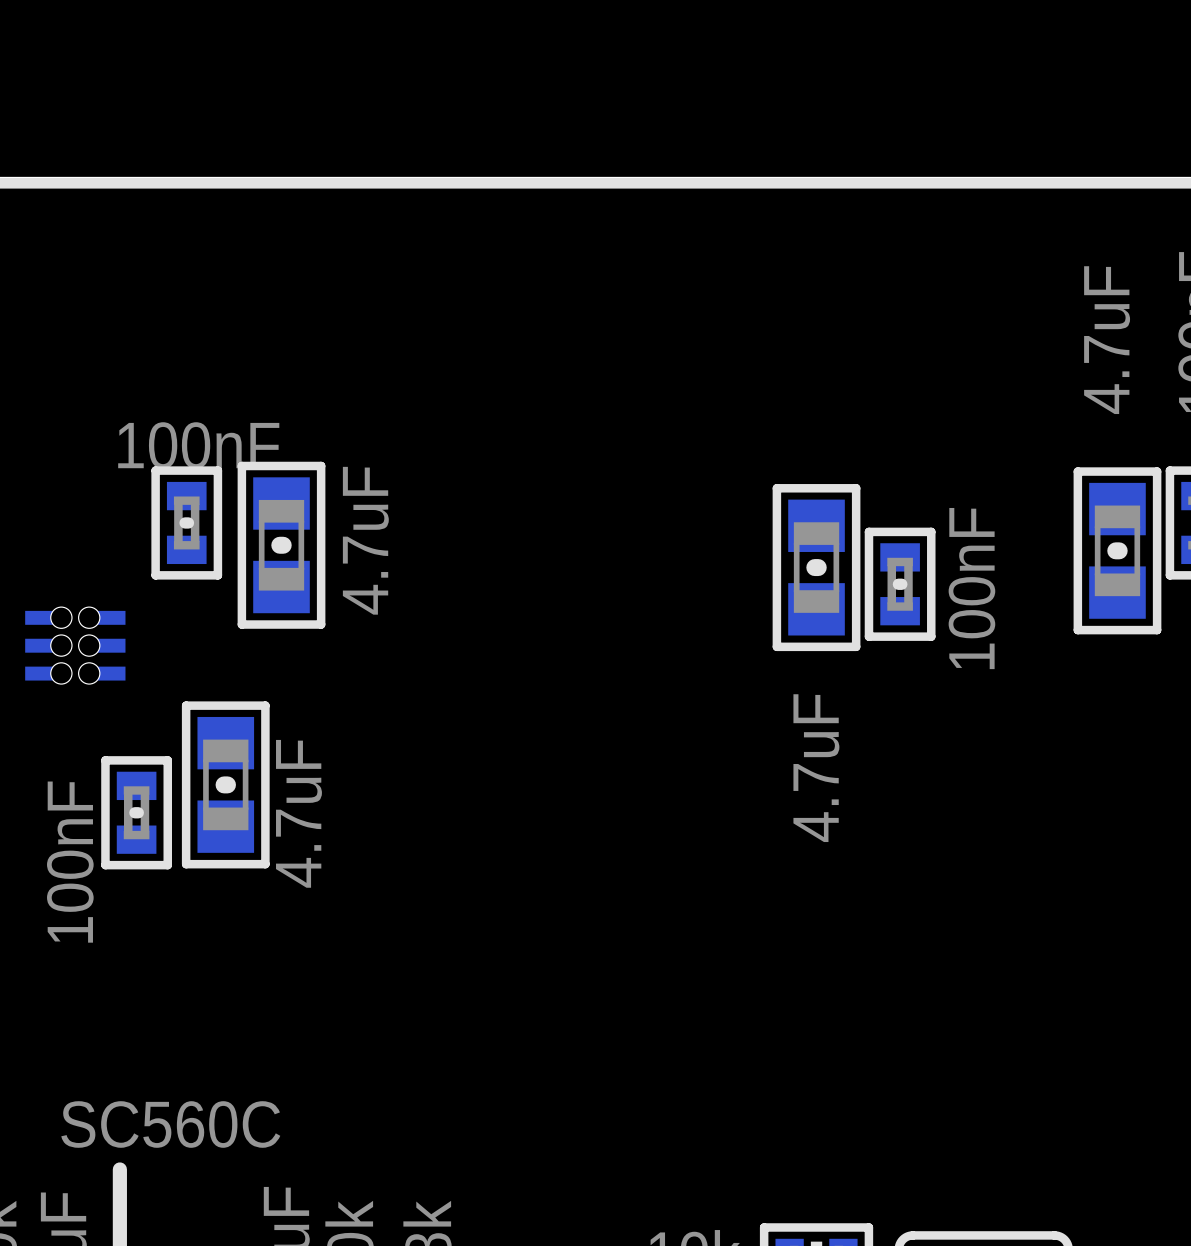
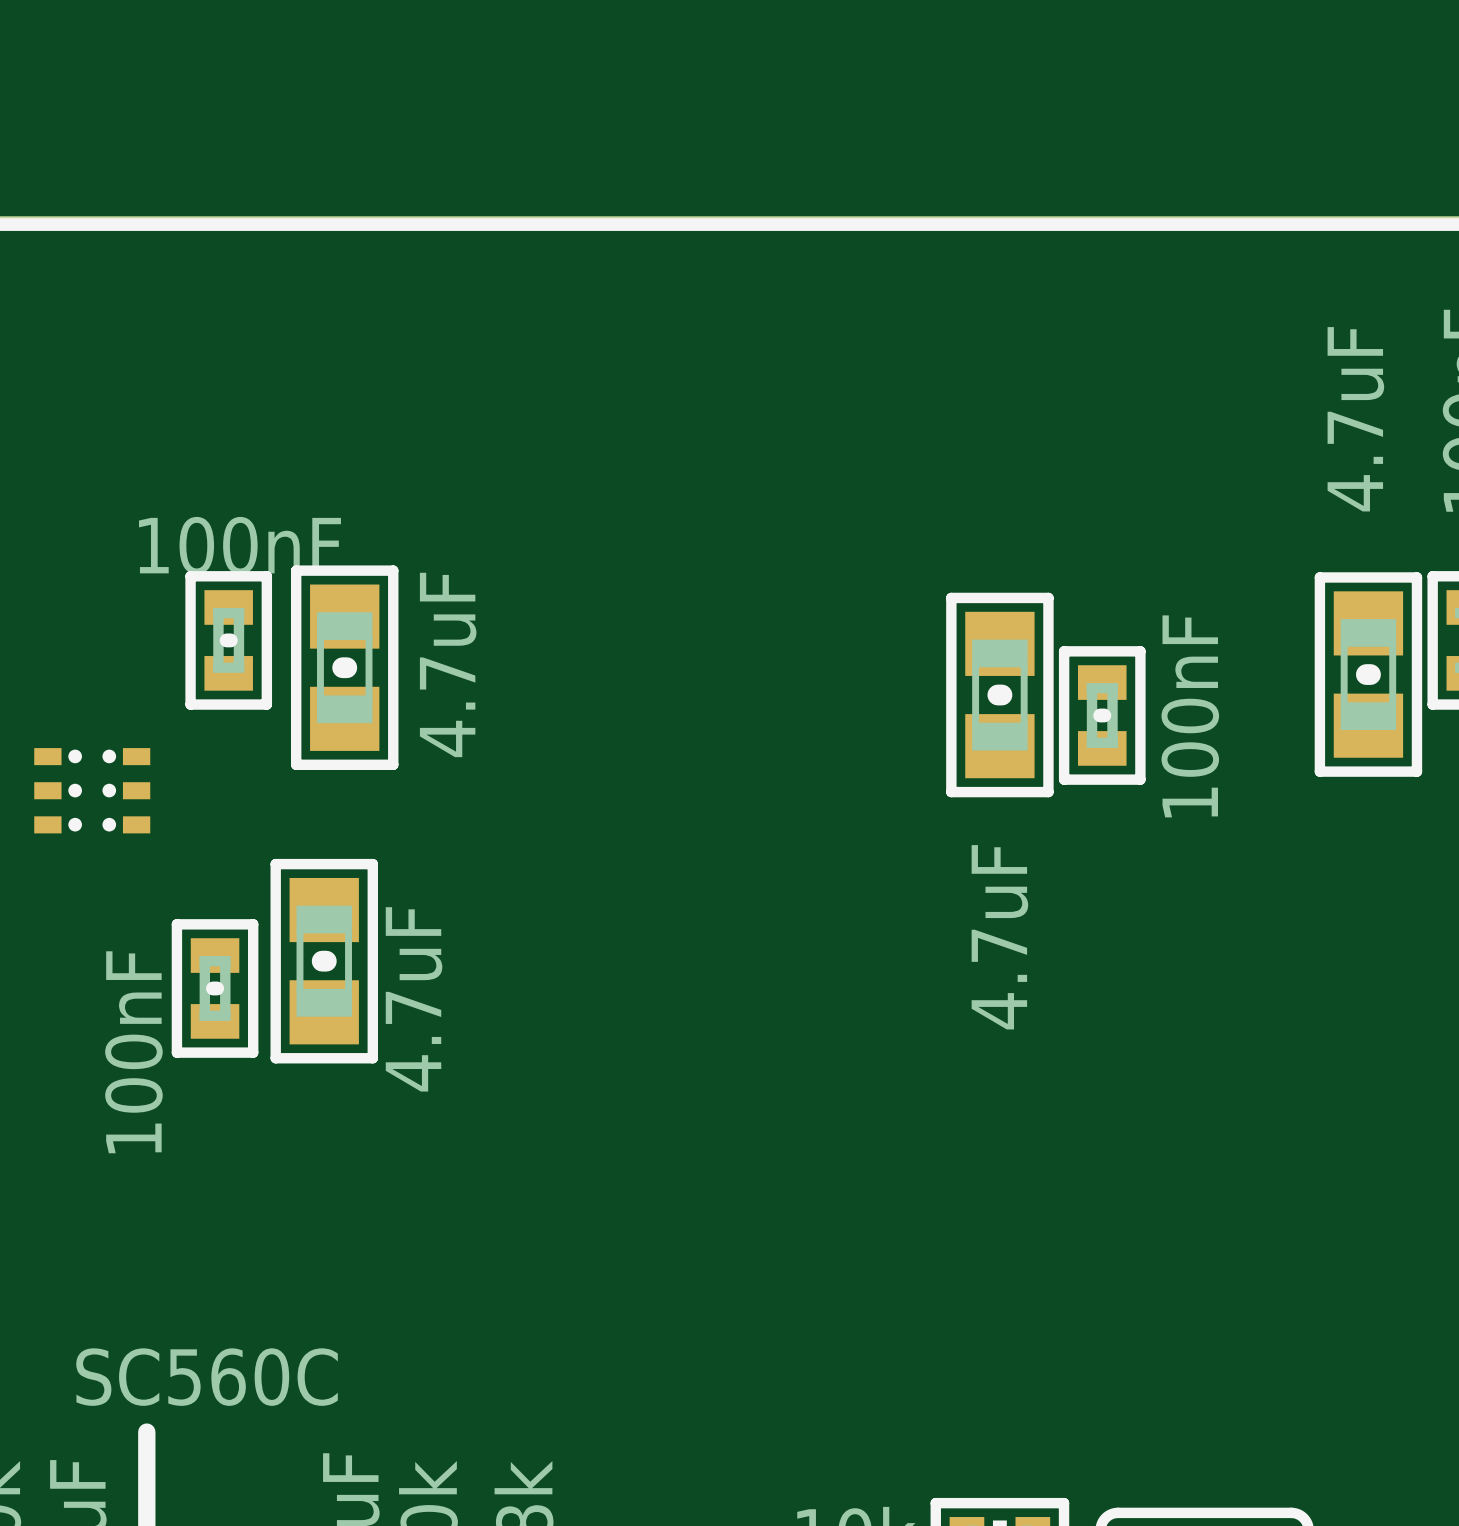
part footprint: [25, 607, 126, 685] -> [34, 748, 151, 834]
part position: (225, 784) -> (324, 961)
part position: (136, 812) -> (215, 988)

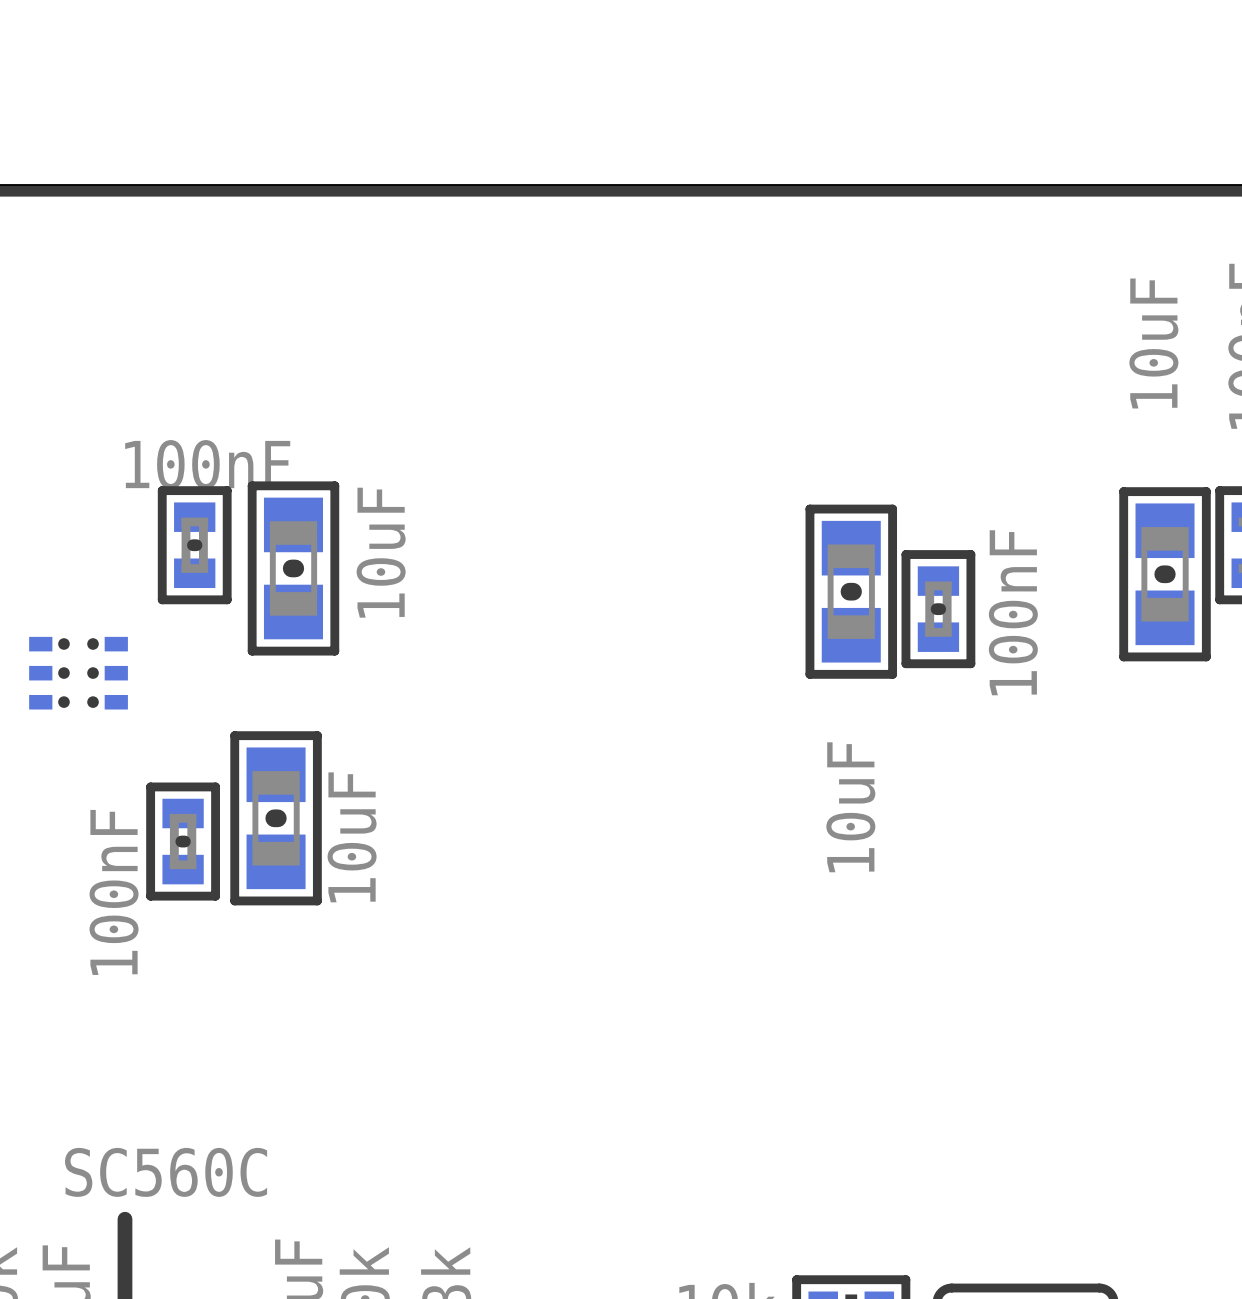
part value: 4.7uF (1355, 419) -> 10uF (1153, 343)
part value: 4.7uF (448, 664) -> 10uF (381, 552)
part value: 4.7uF (999, 937) -> 10uF (850, 807)
part value: 4.7uF (414, 999) -> 10uF (352, 837)

